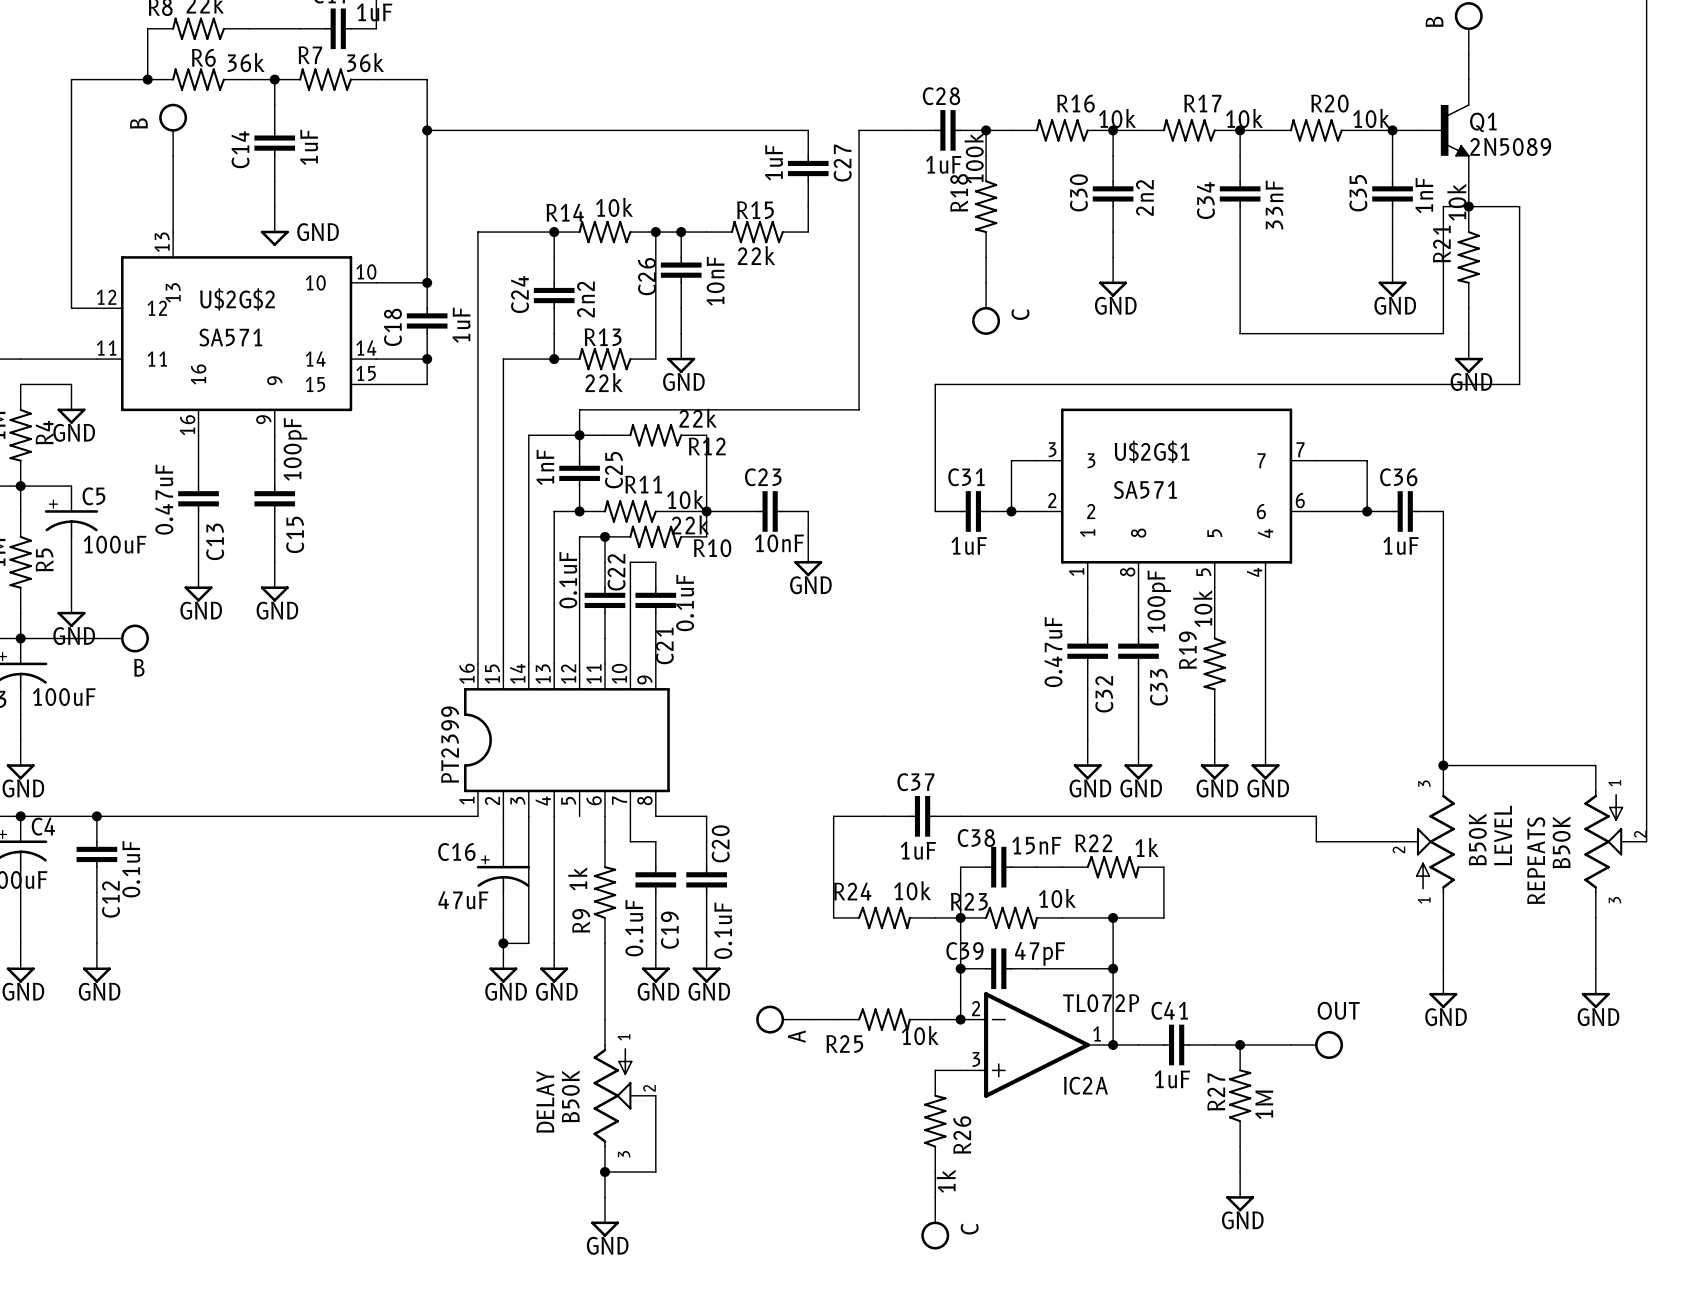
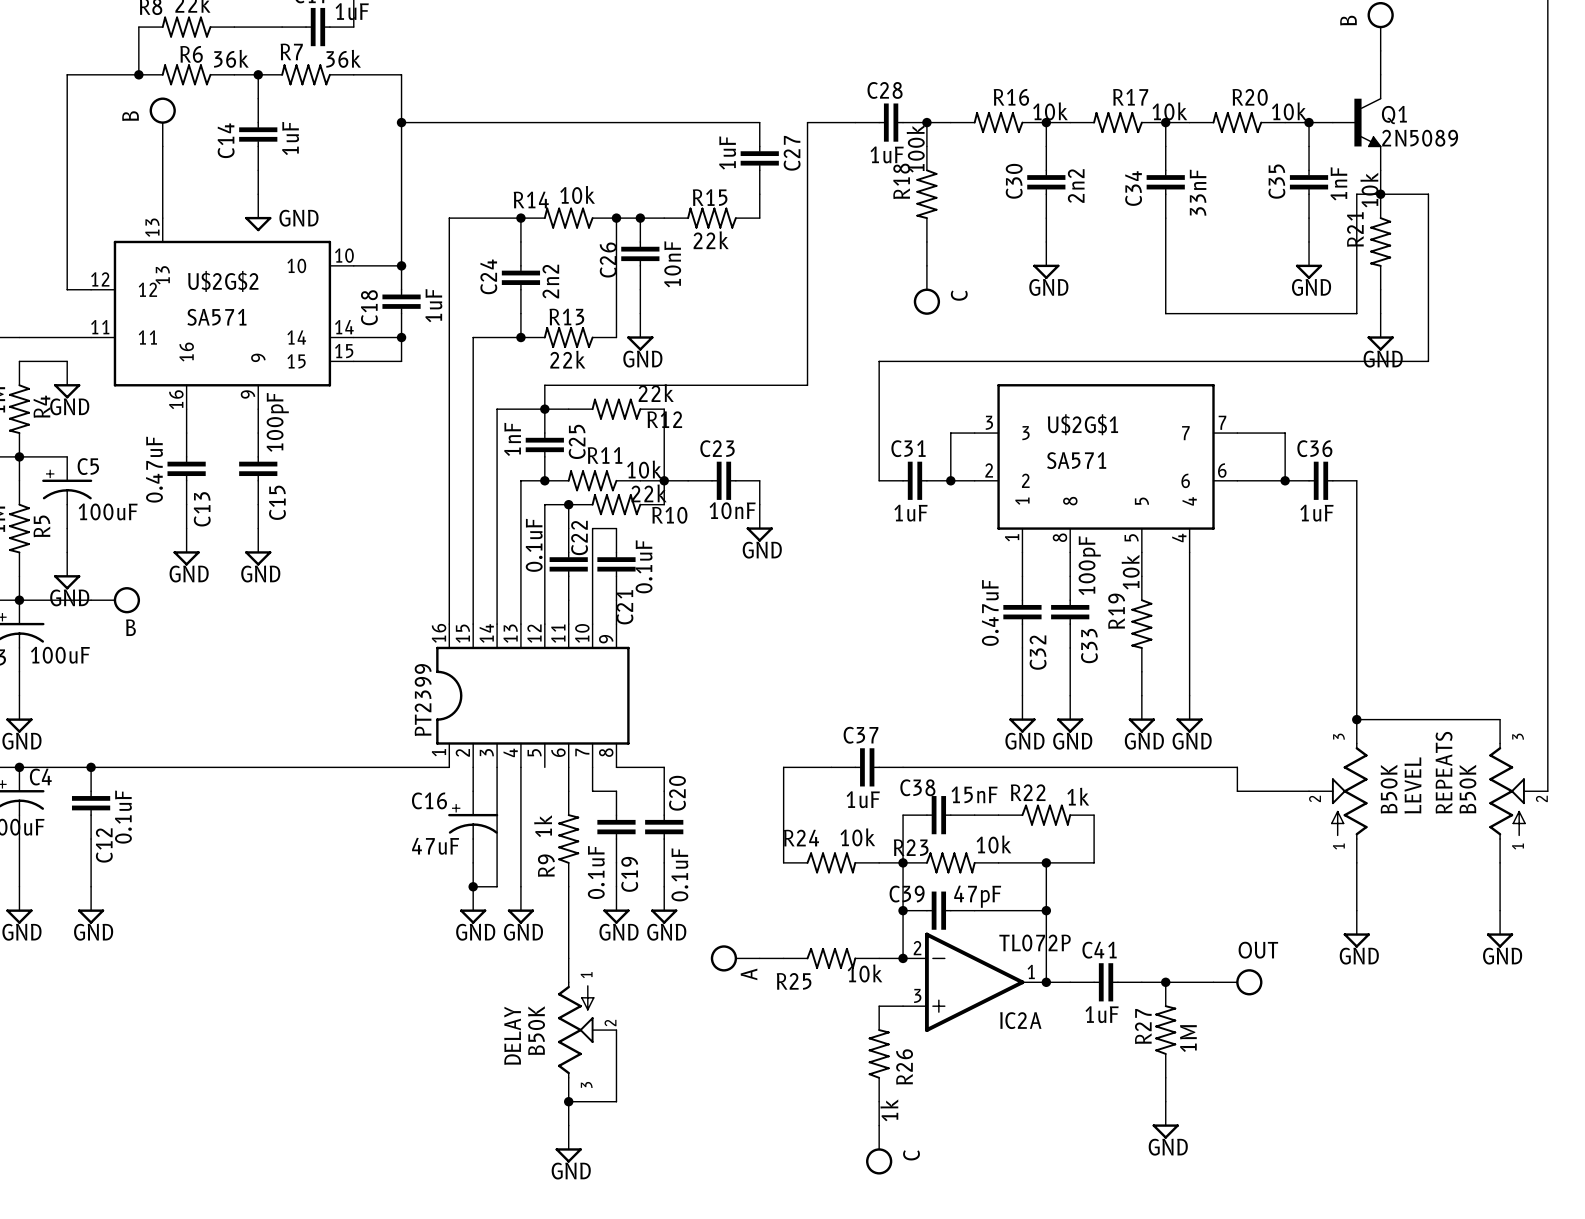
REPEATS flip: as is (1603, 841) -> up-down (1507, 791)

